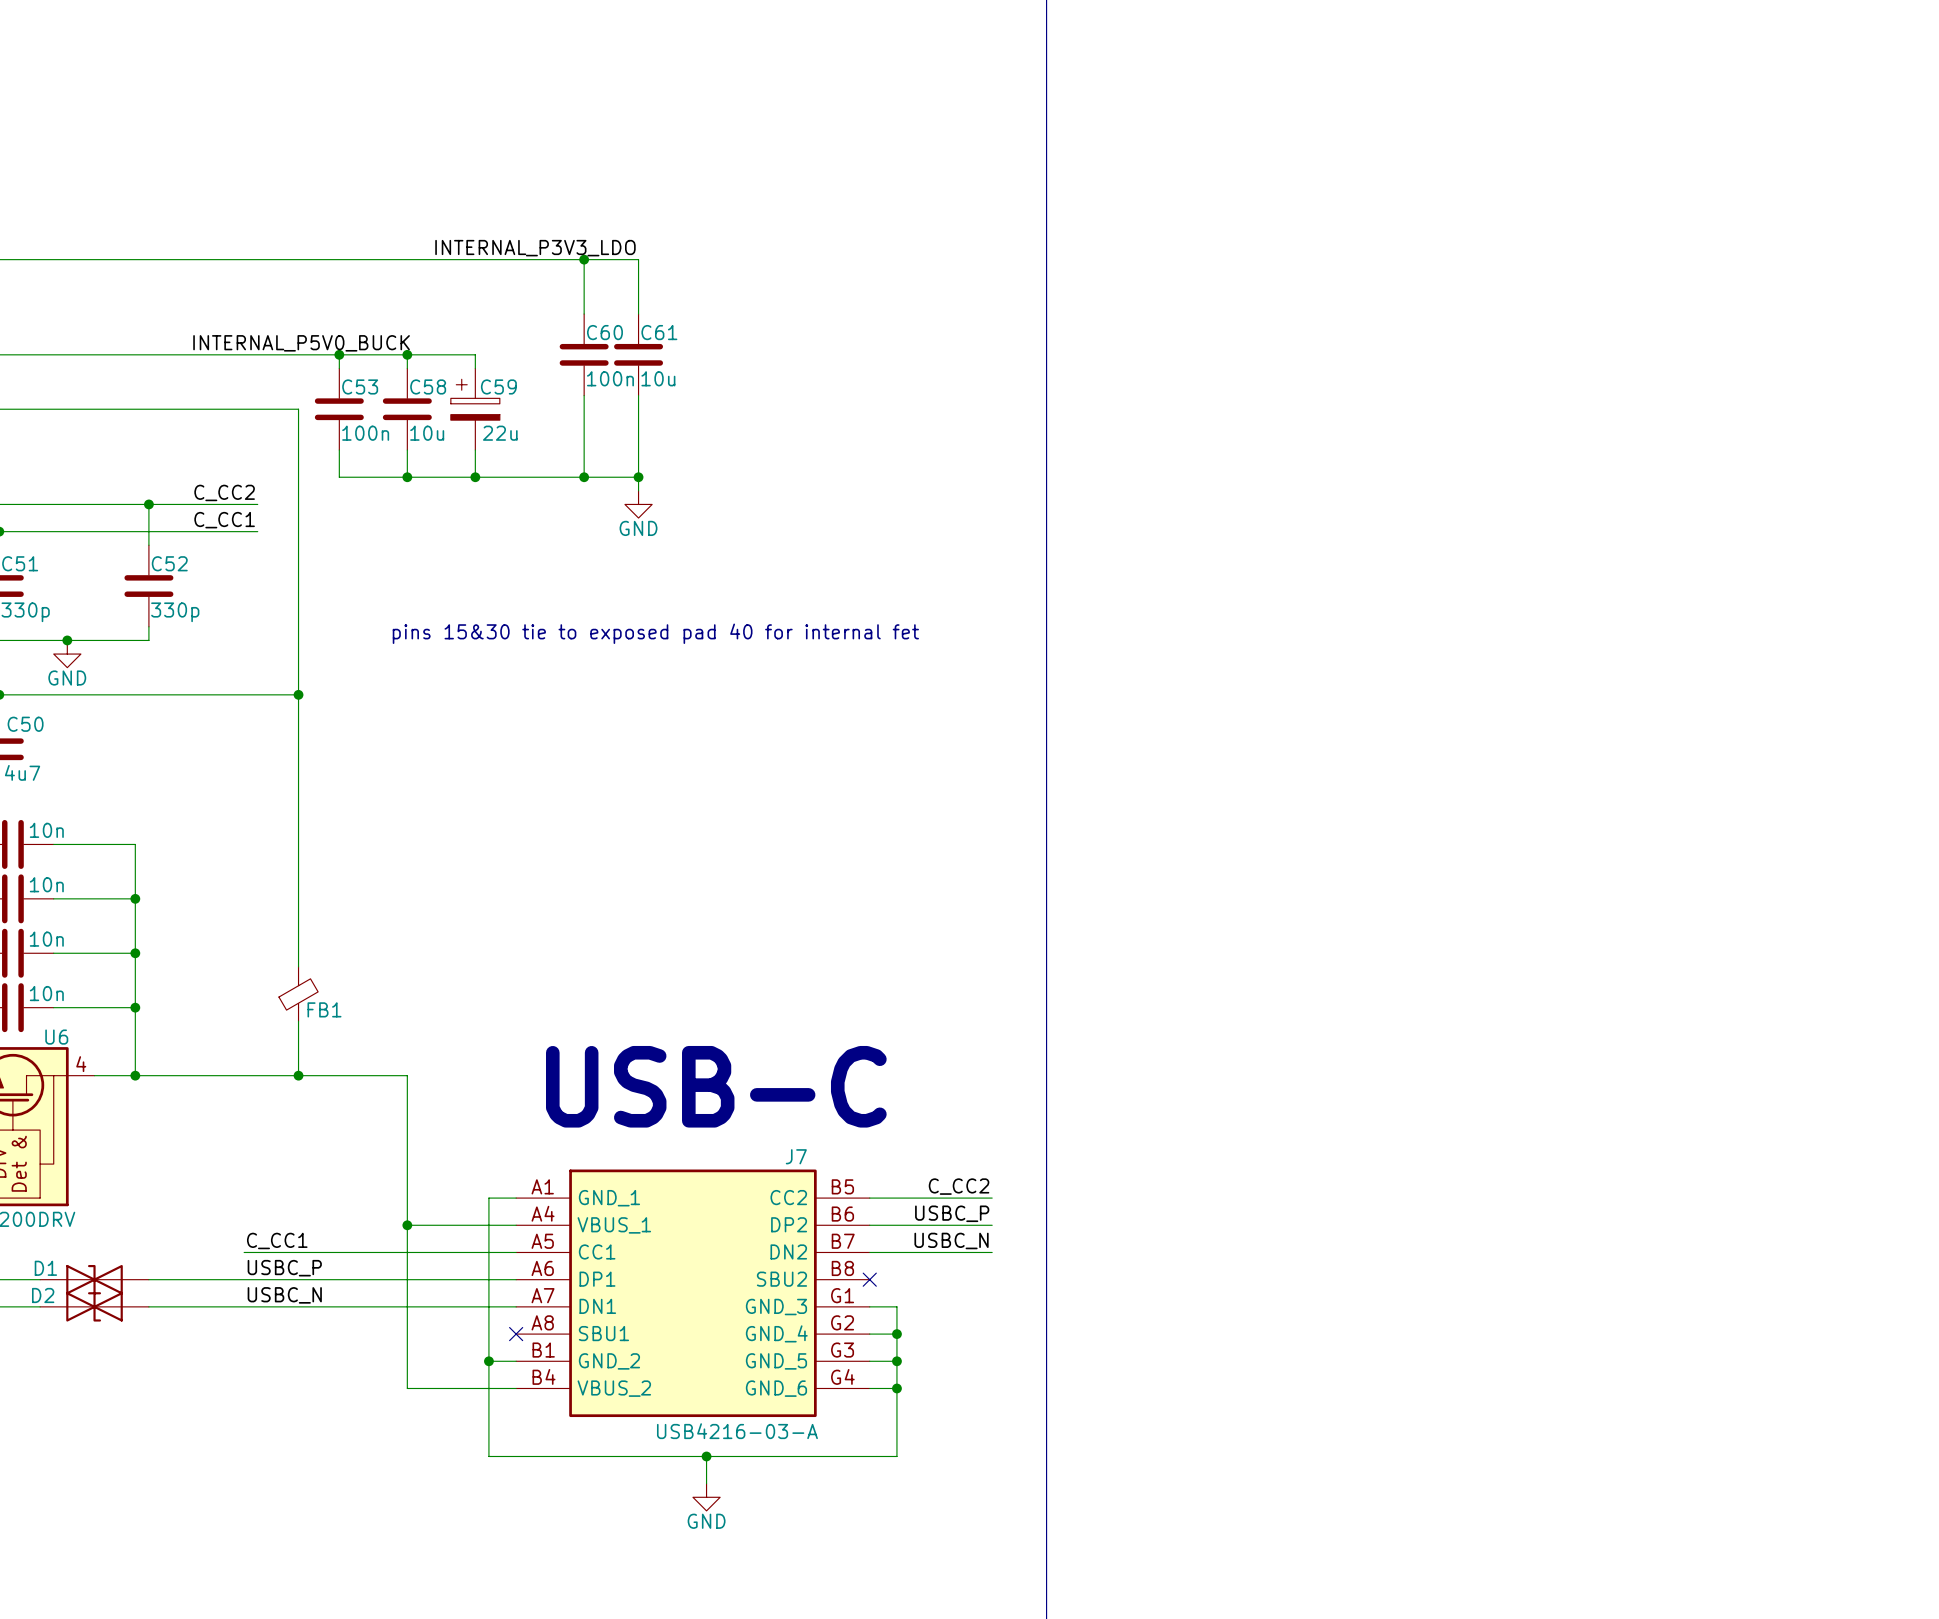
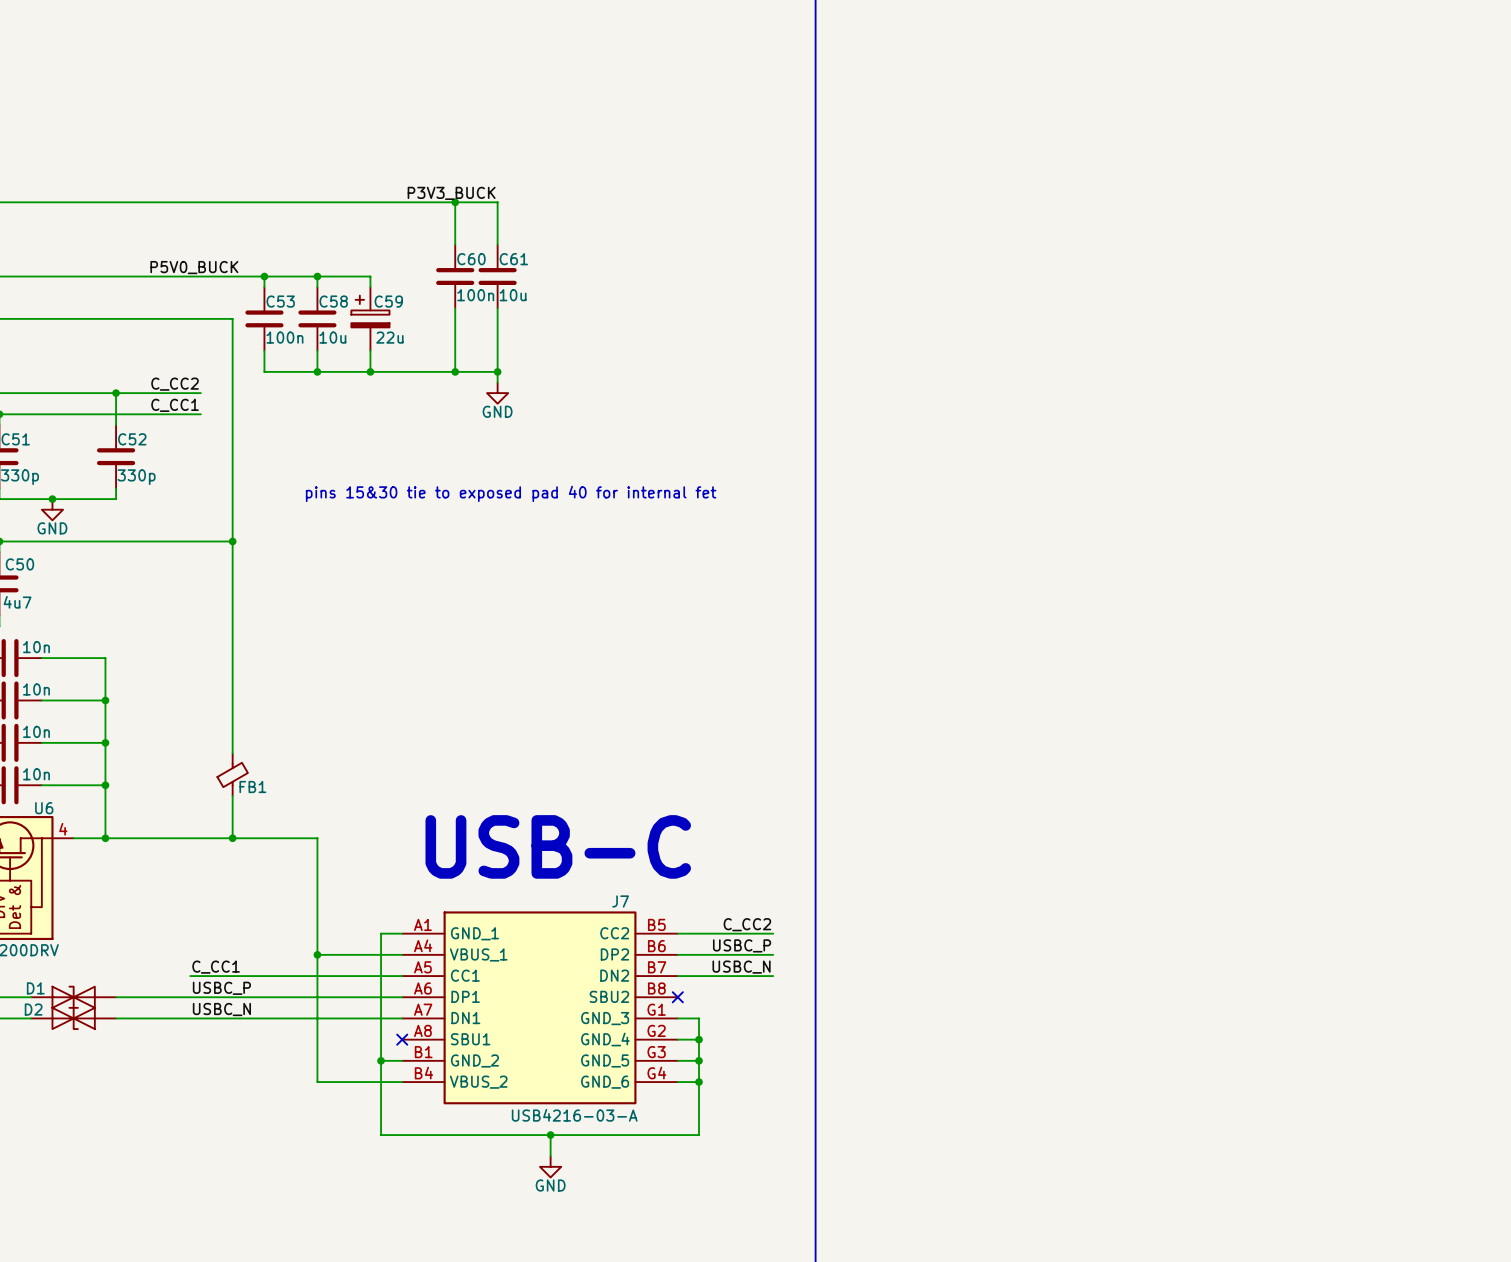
label: INTERNAL_P3V3_LDO (535, 248) -> P3V3_BUCK (451, 193)
label: INTERNAL_P5V0_BUCK (301, 343) -> P5V0_BUCK (194, 267)

